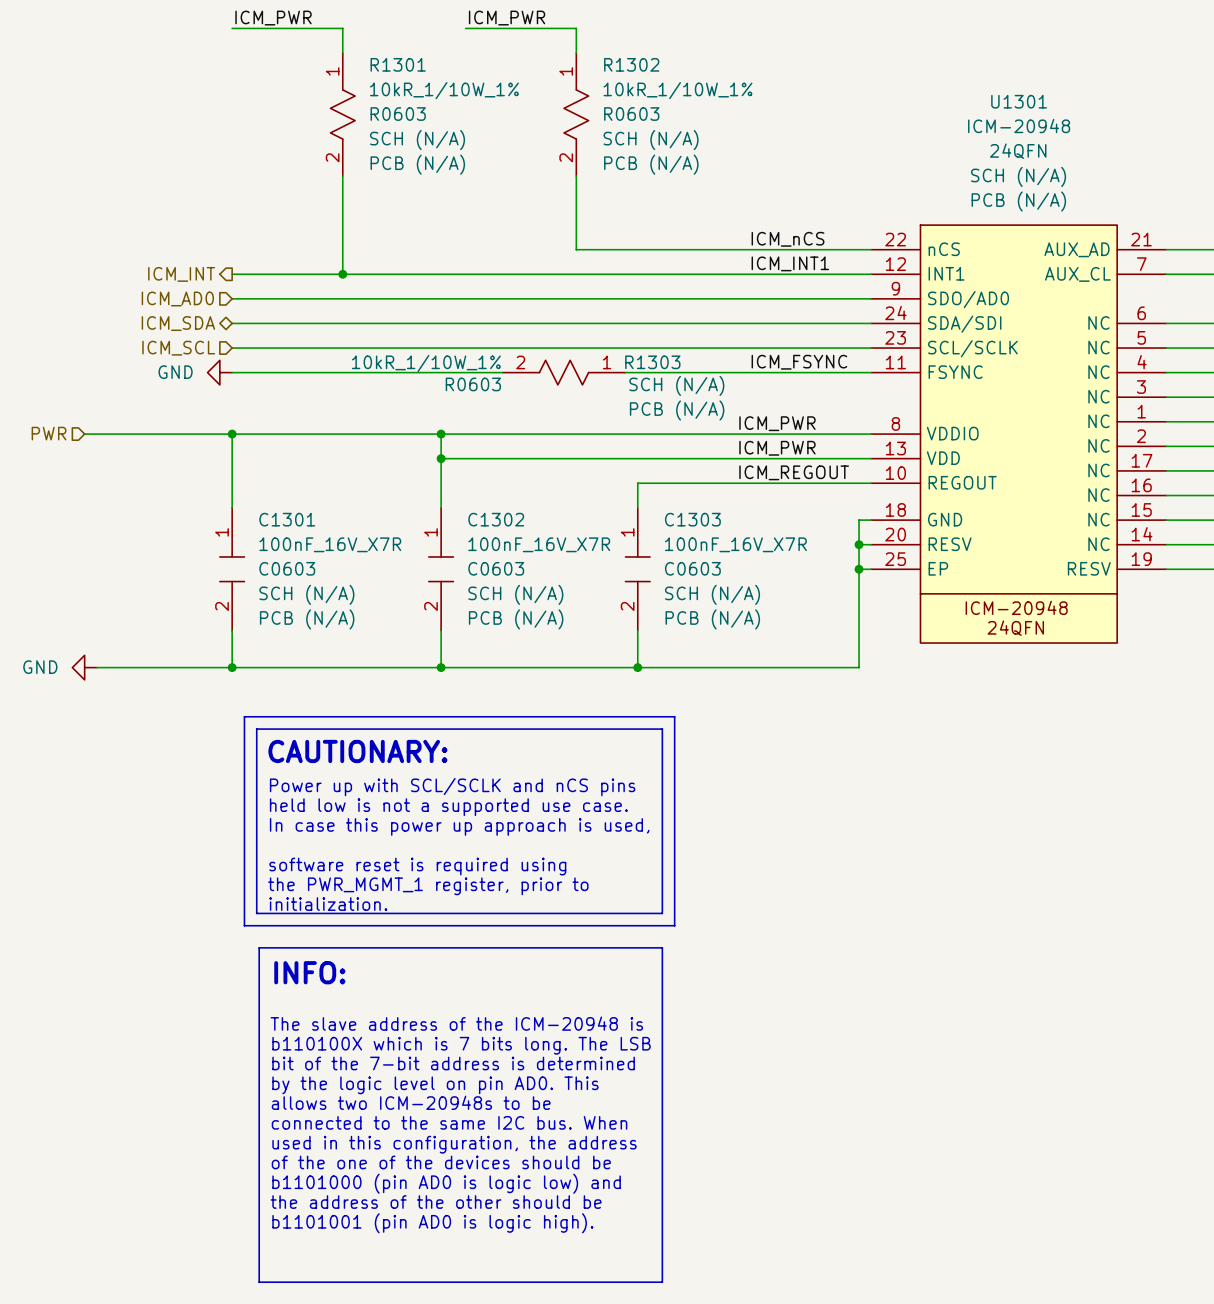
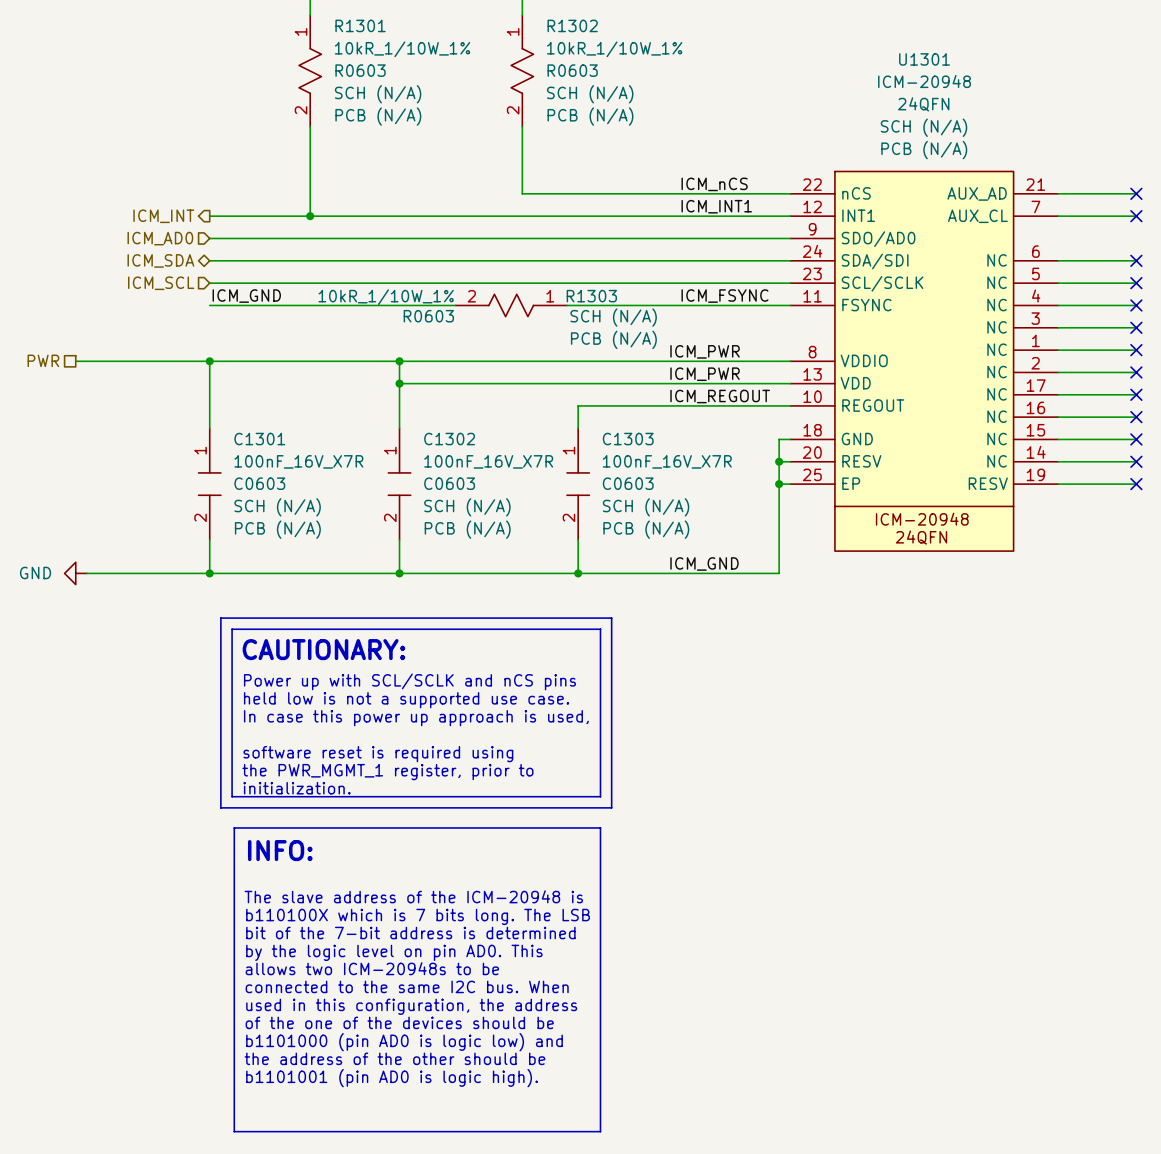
label: none -> ICM_GND (246, 296)
power symbol: GND (219, 372) -> none
hierarchical label shape: input (49, 433) -> passive (43, 360)
label: none -> ICM_GND (704, 563)

